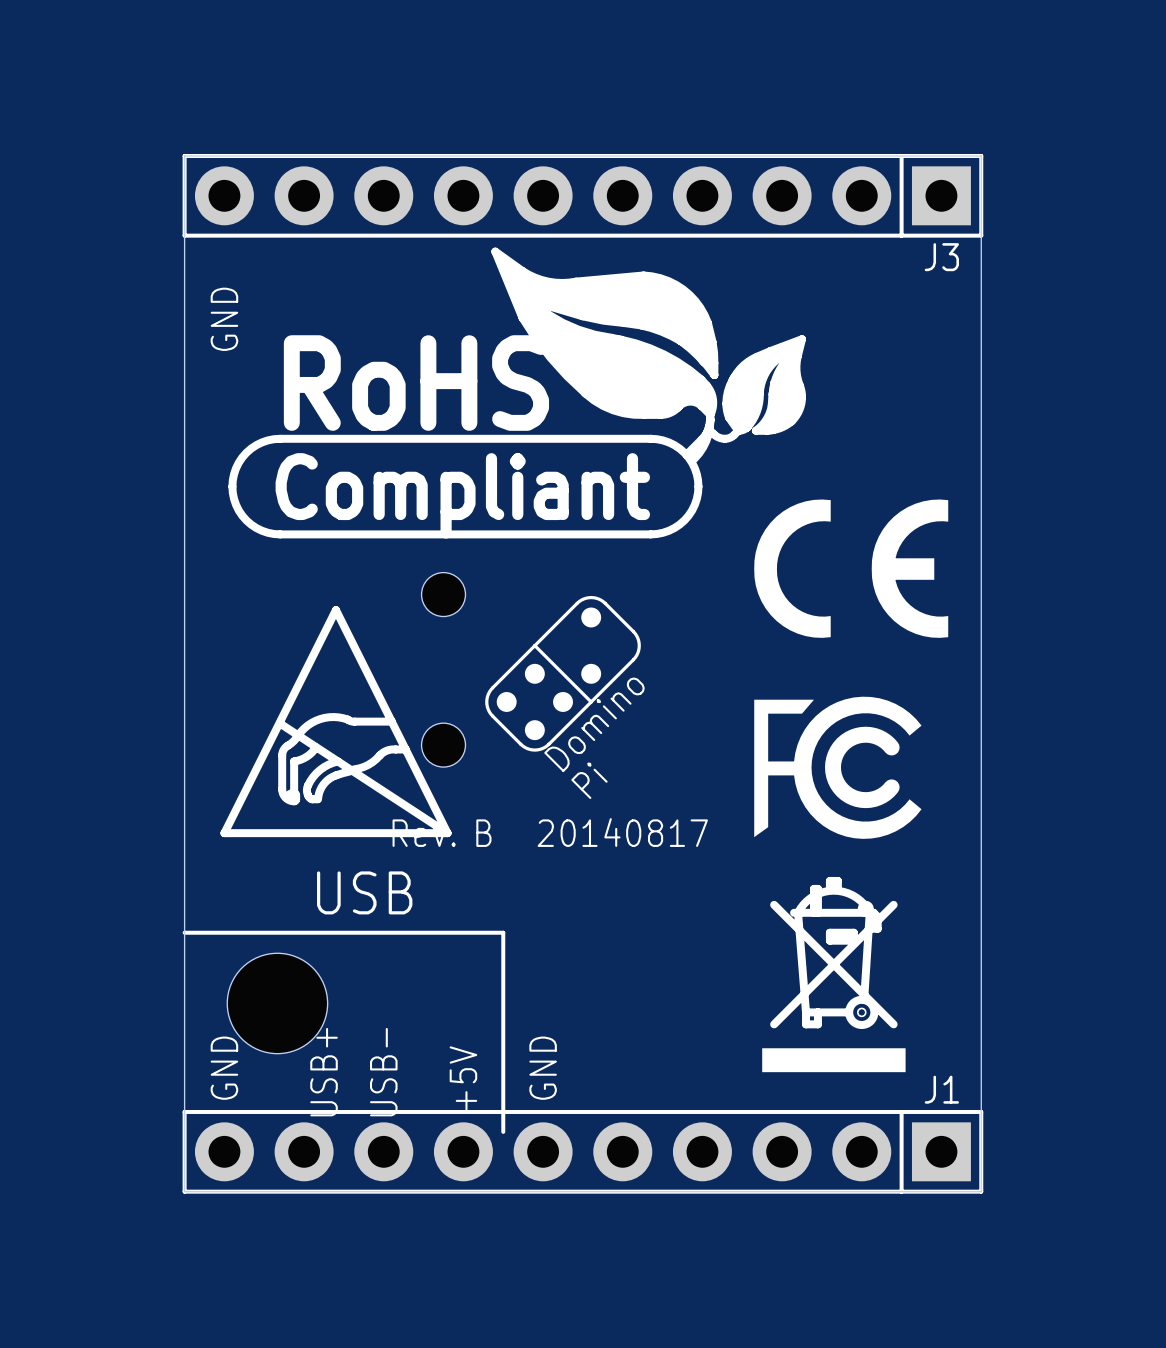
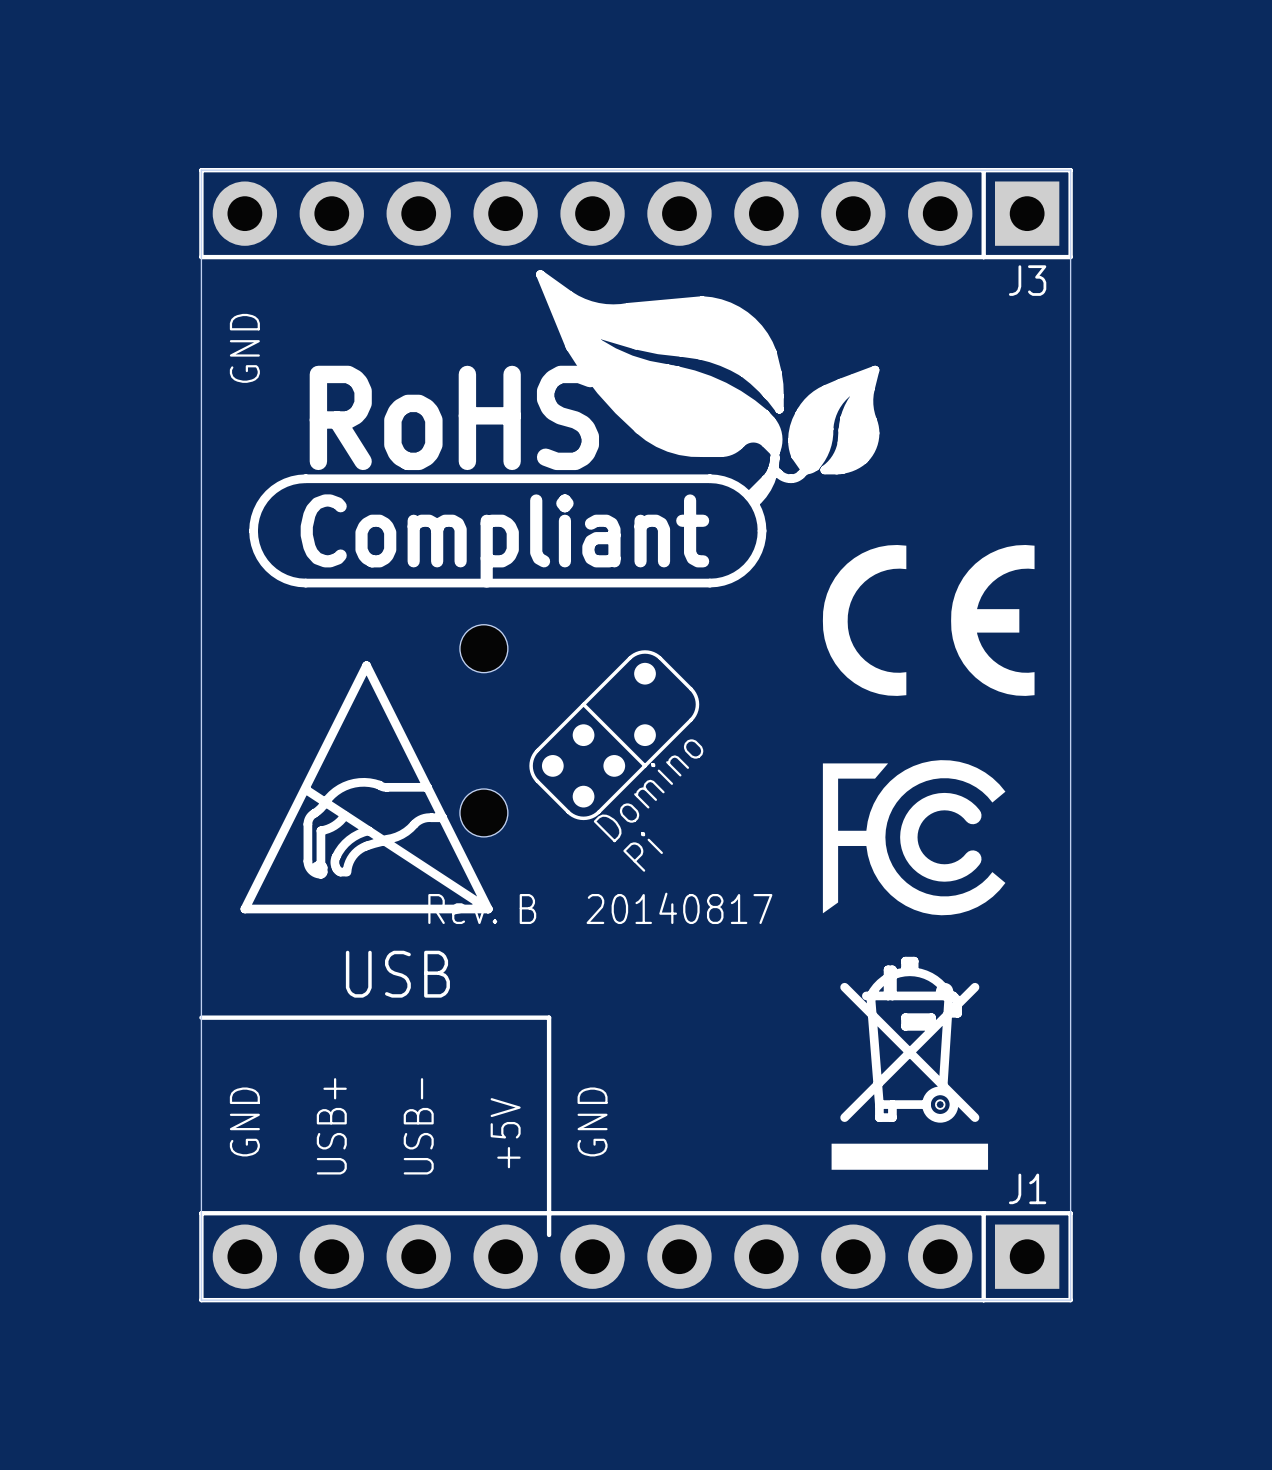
hole: (277, 1003) -> none
text position: GND (224, 1068) -> GND (244, 1121)
text position: GND (543, 1068) -> GND (592, 1121)
text position: USB+ (324, 1072) -> USB+ (331, 1126)
text position: USB- (383, 1072) -> USB- (418, 1126)
text position: +5V (463, 1078) -> +5V (505, 1133)

